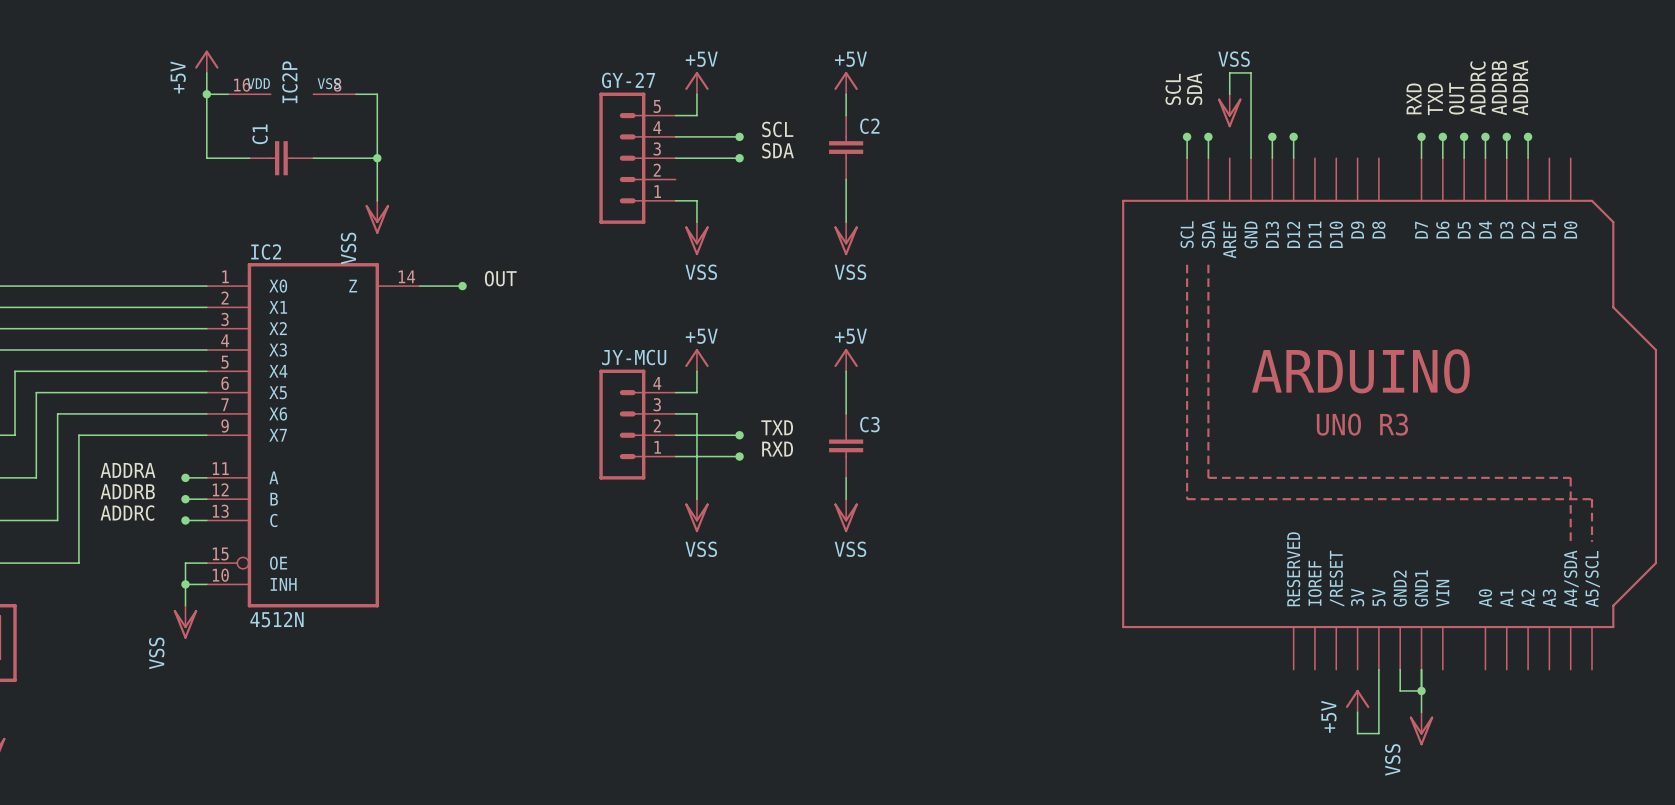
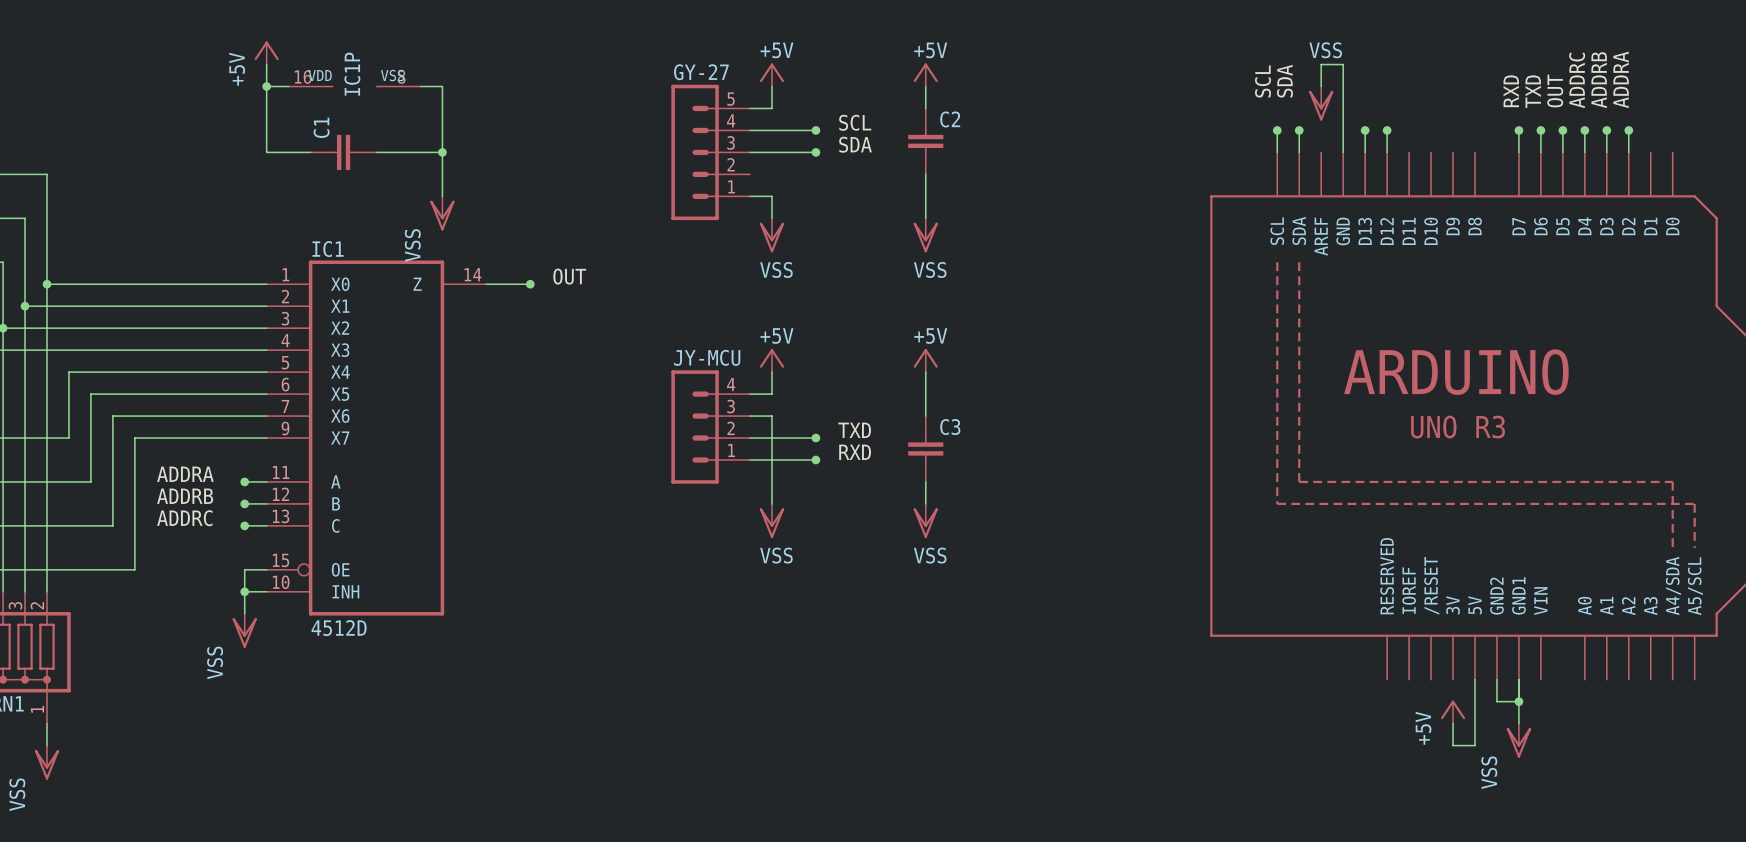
IC2P name: IC2P (289, 82) -> IC1P (352, 74)
IC2 name: IC2 (266, 251) -> IC1 (328, 249)
IC2 value: 4512N (276, 619) -> 4512D (339, 628)

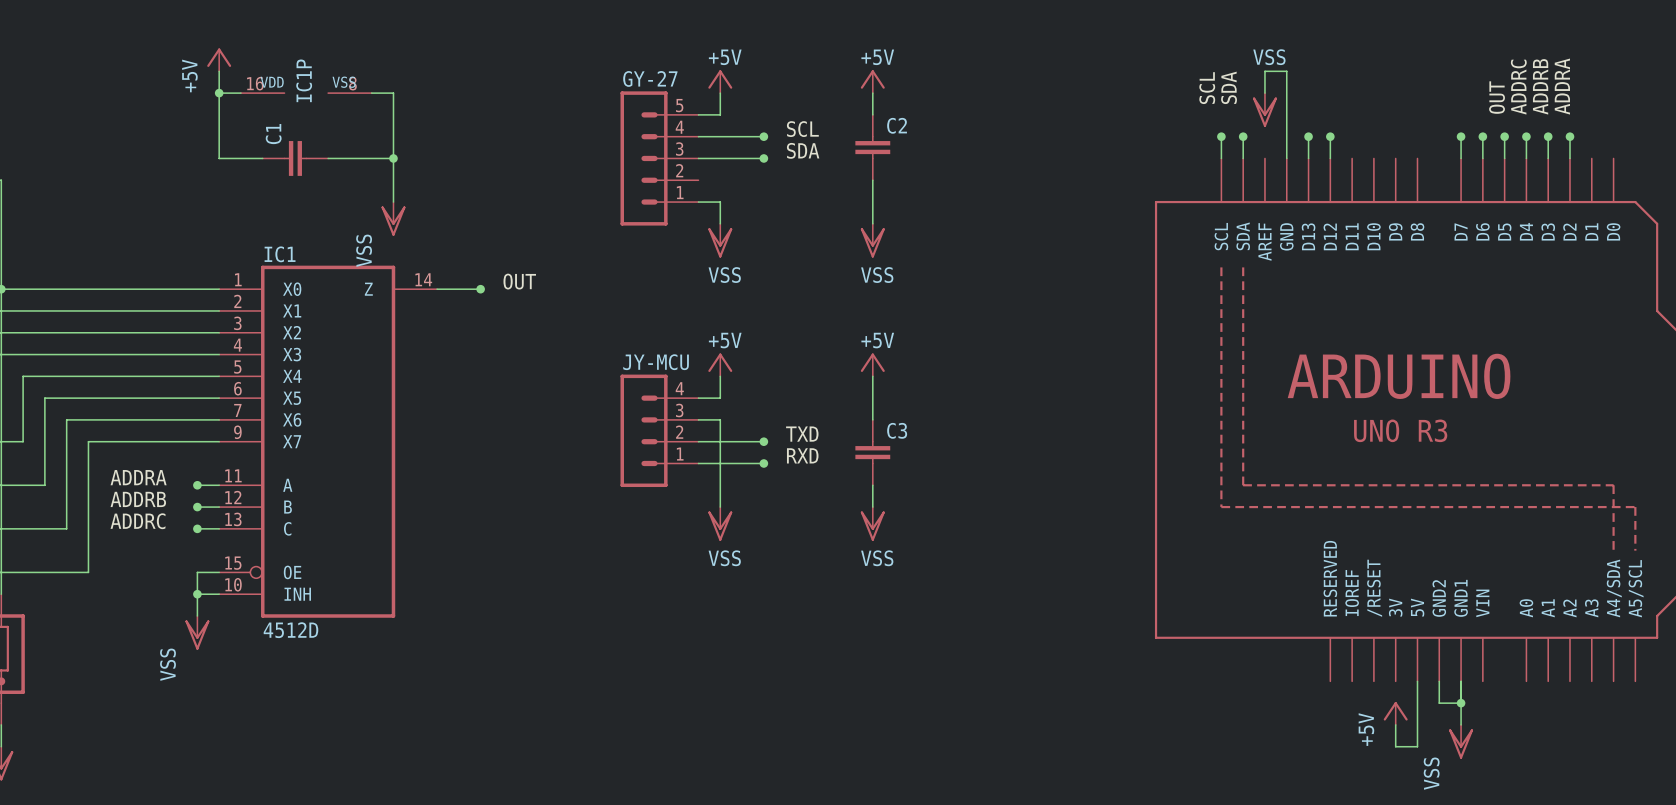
label: RXD (1511, 91) -> none
label: TXD (1533, 91) -> none

